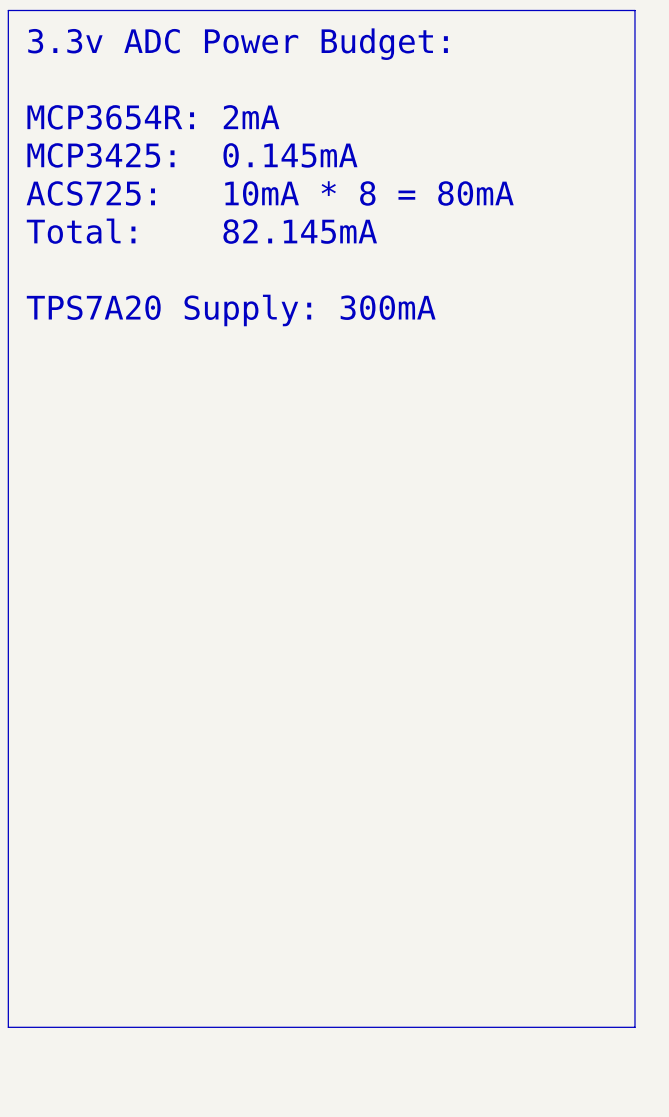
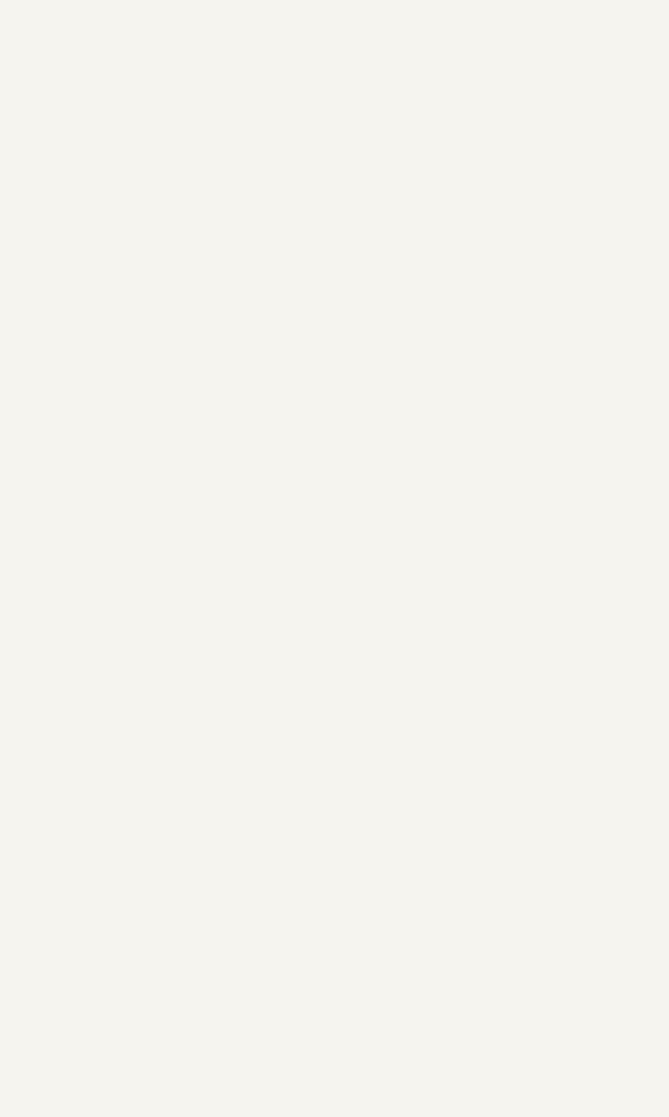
line: (8, 10) (634, 10) (634, 1027) (8, 1027) (8, 10) -> none
text: 3.3v ADC Power Budget: (238, 44) -> none
text: MCP3654R: 2mA (153, 117) -> none
text: MCP3425: 0.145mA (192, 155) -> none
text: ACS725: 10mA * 8 = 80mA (270, 193) -> none
text: Total: 82.145mA (201, 231) -> none
text: TPS7A20 Supply: 300mA (231, 310) -> none

